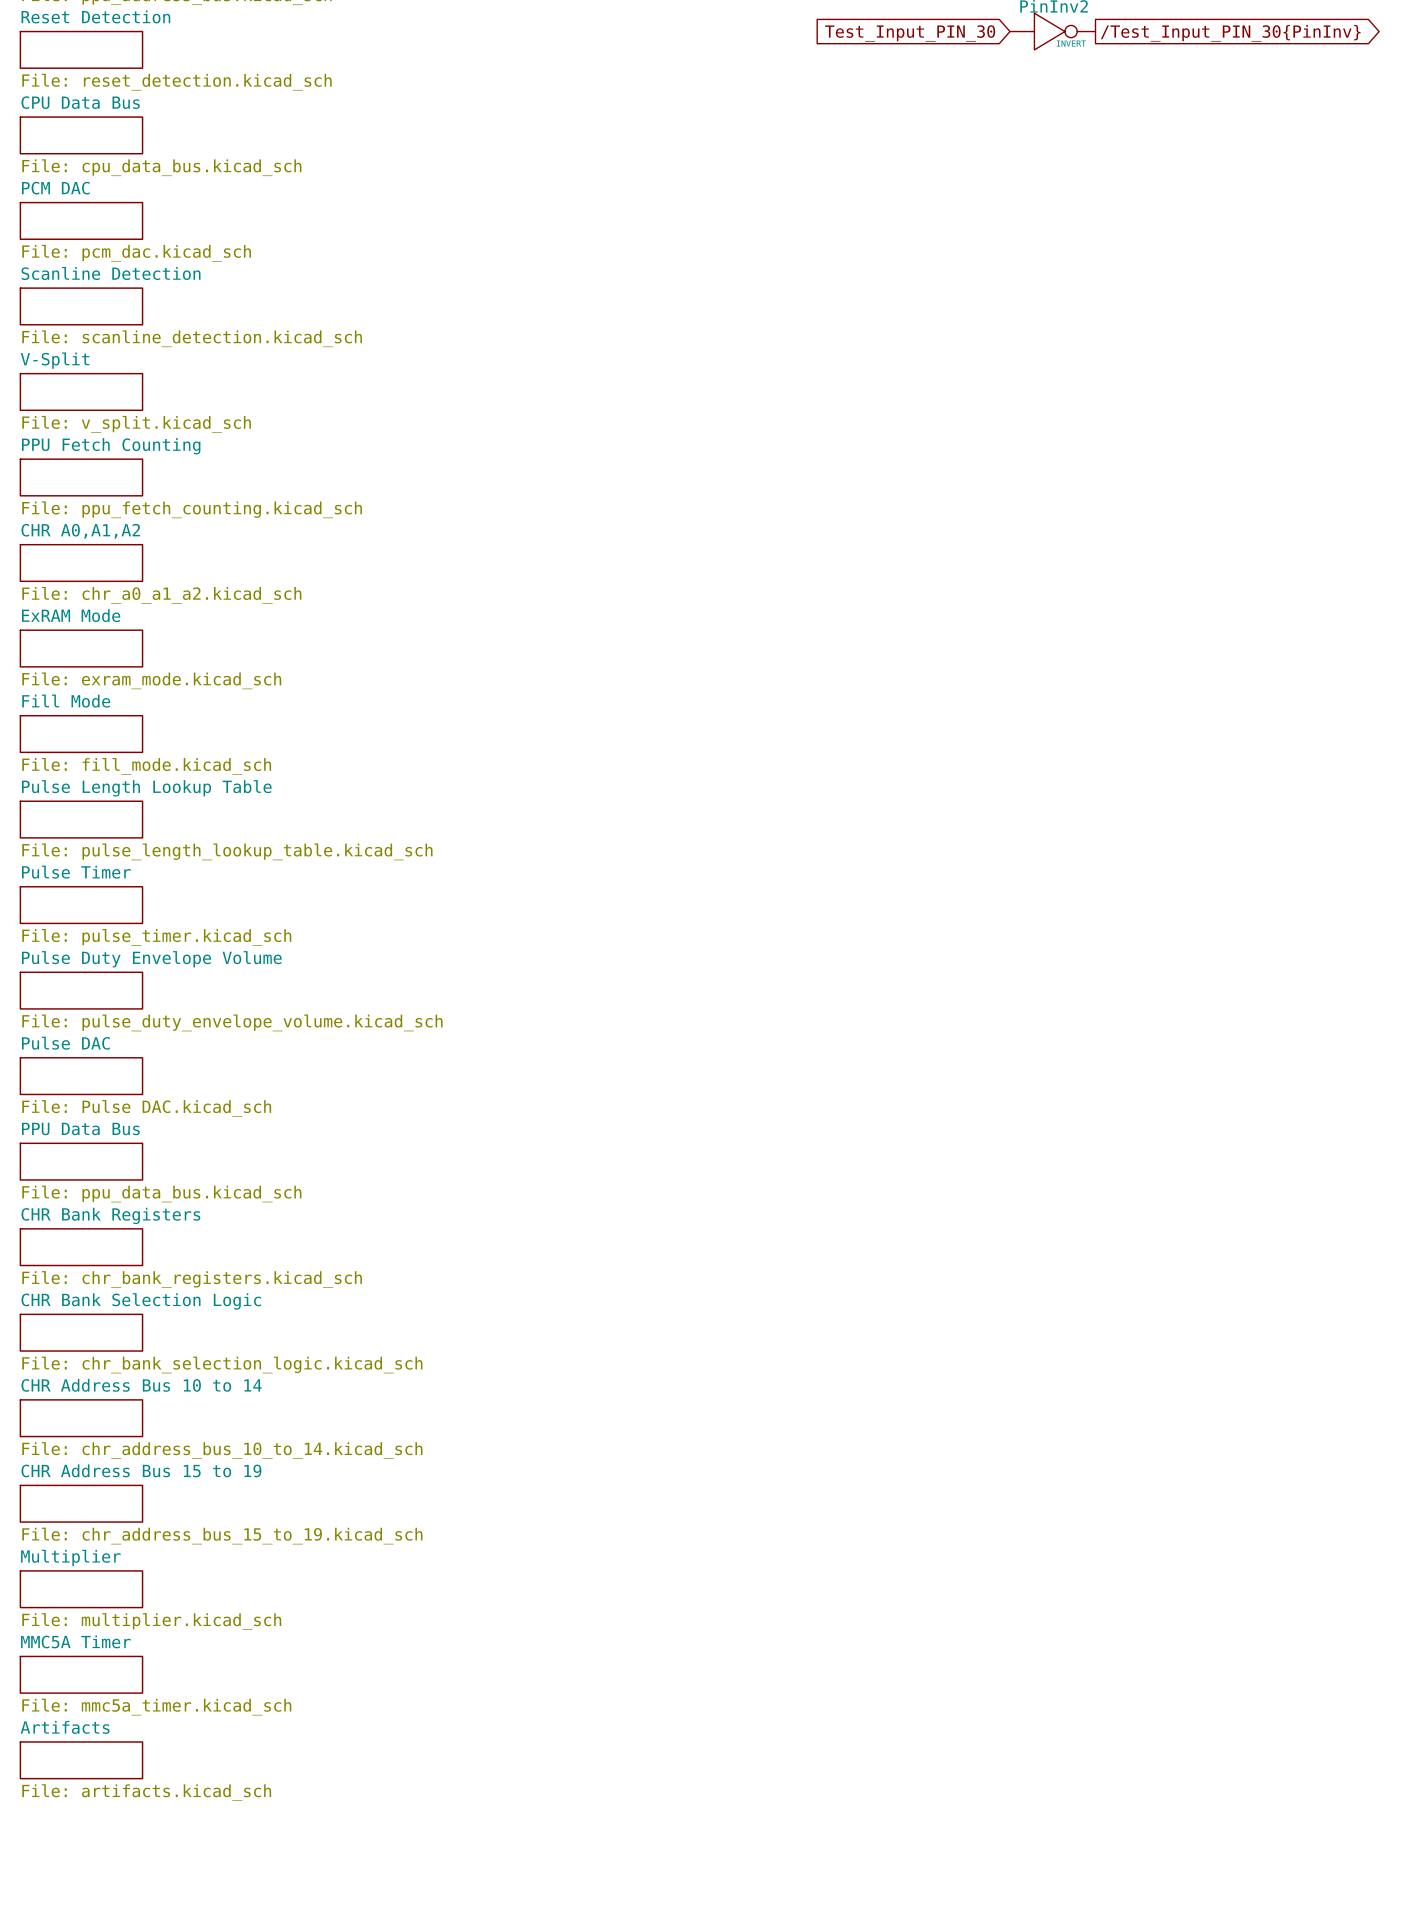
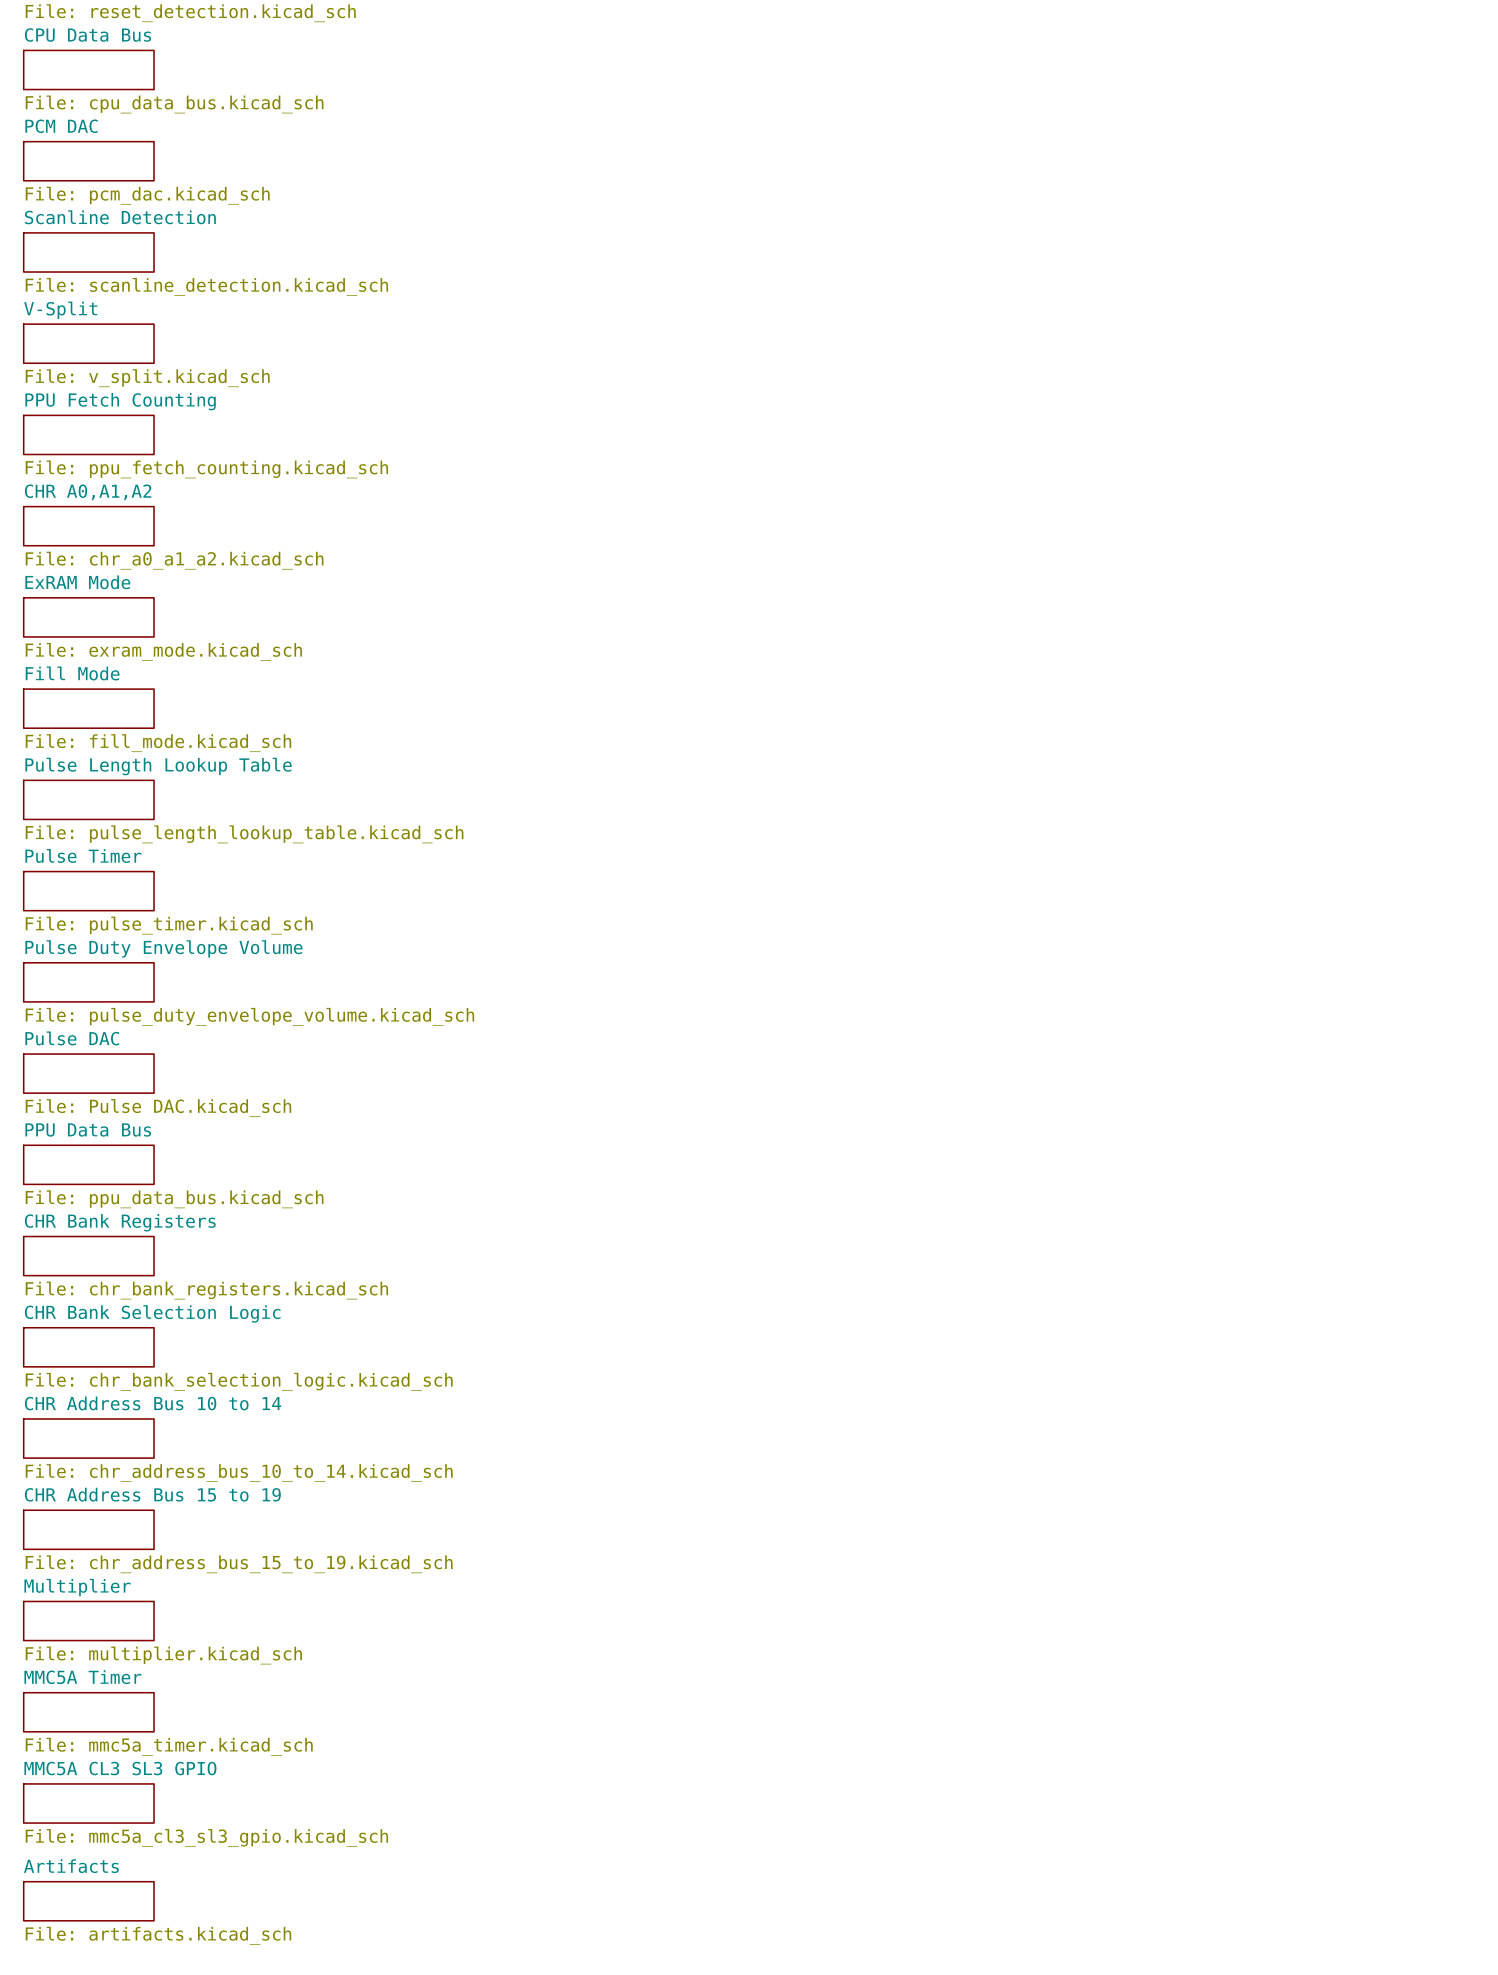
sheet Artifacts name: Artifacts (65, 1727) -> MMC5A CL3 SL3 GPIO (120, 1768)
sheet Artifacts value: File: artifacts.kicad_sch (146, 1792) -> File: mmc5a_cl3_sl3_gpio.kicad_sch (206, 1837)
sheet Artifacts: none -> File: artifacts.kicad_sch (88, 1901)

